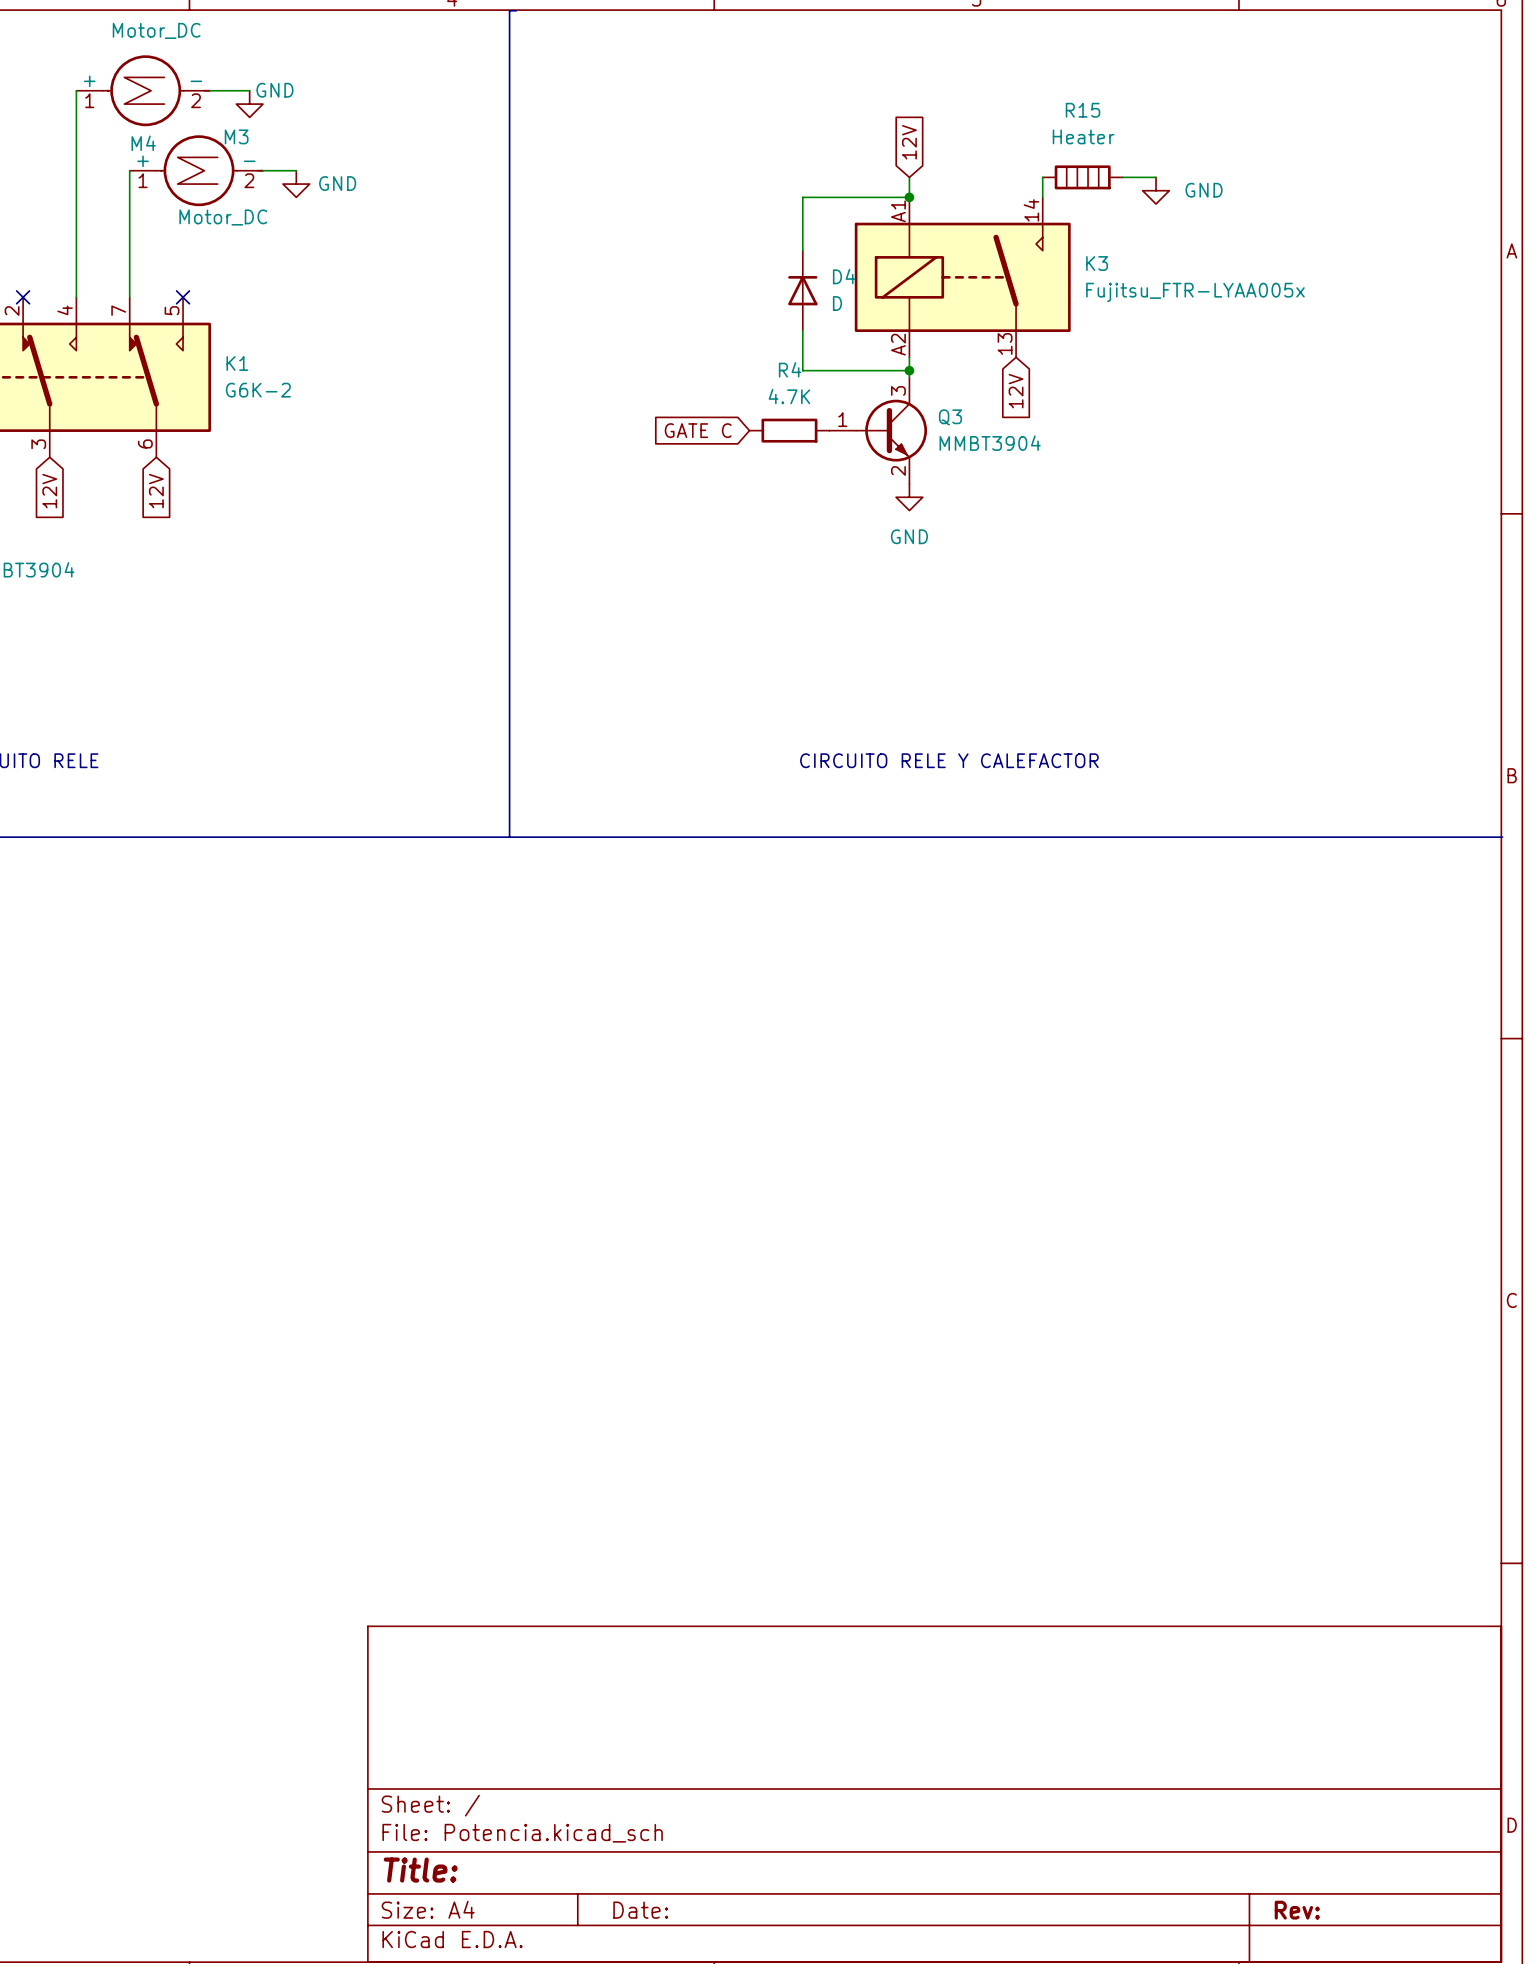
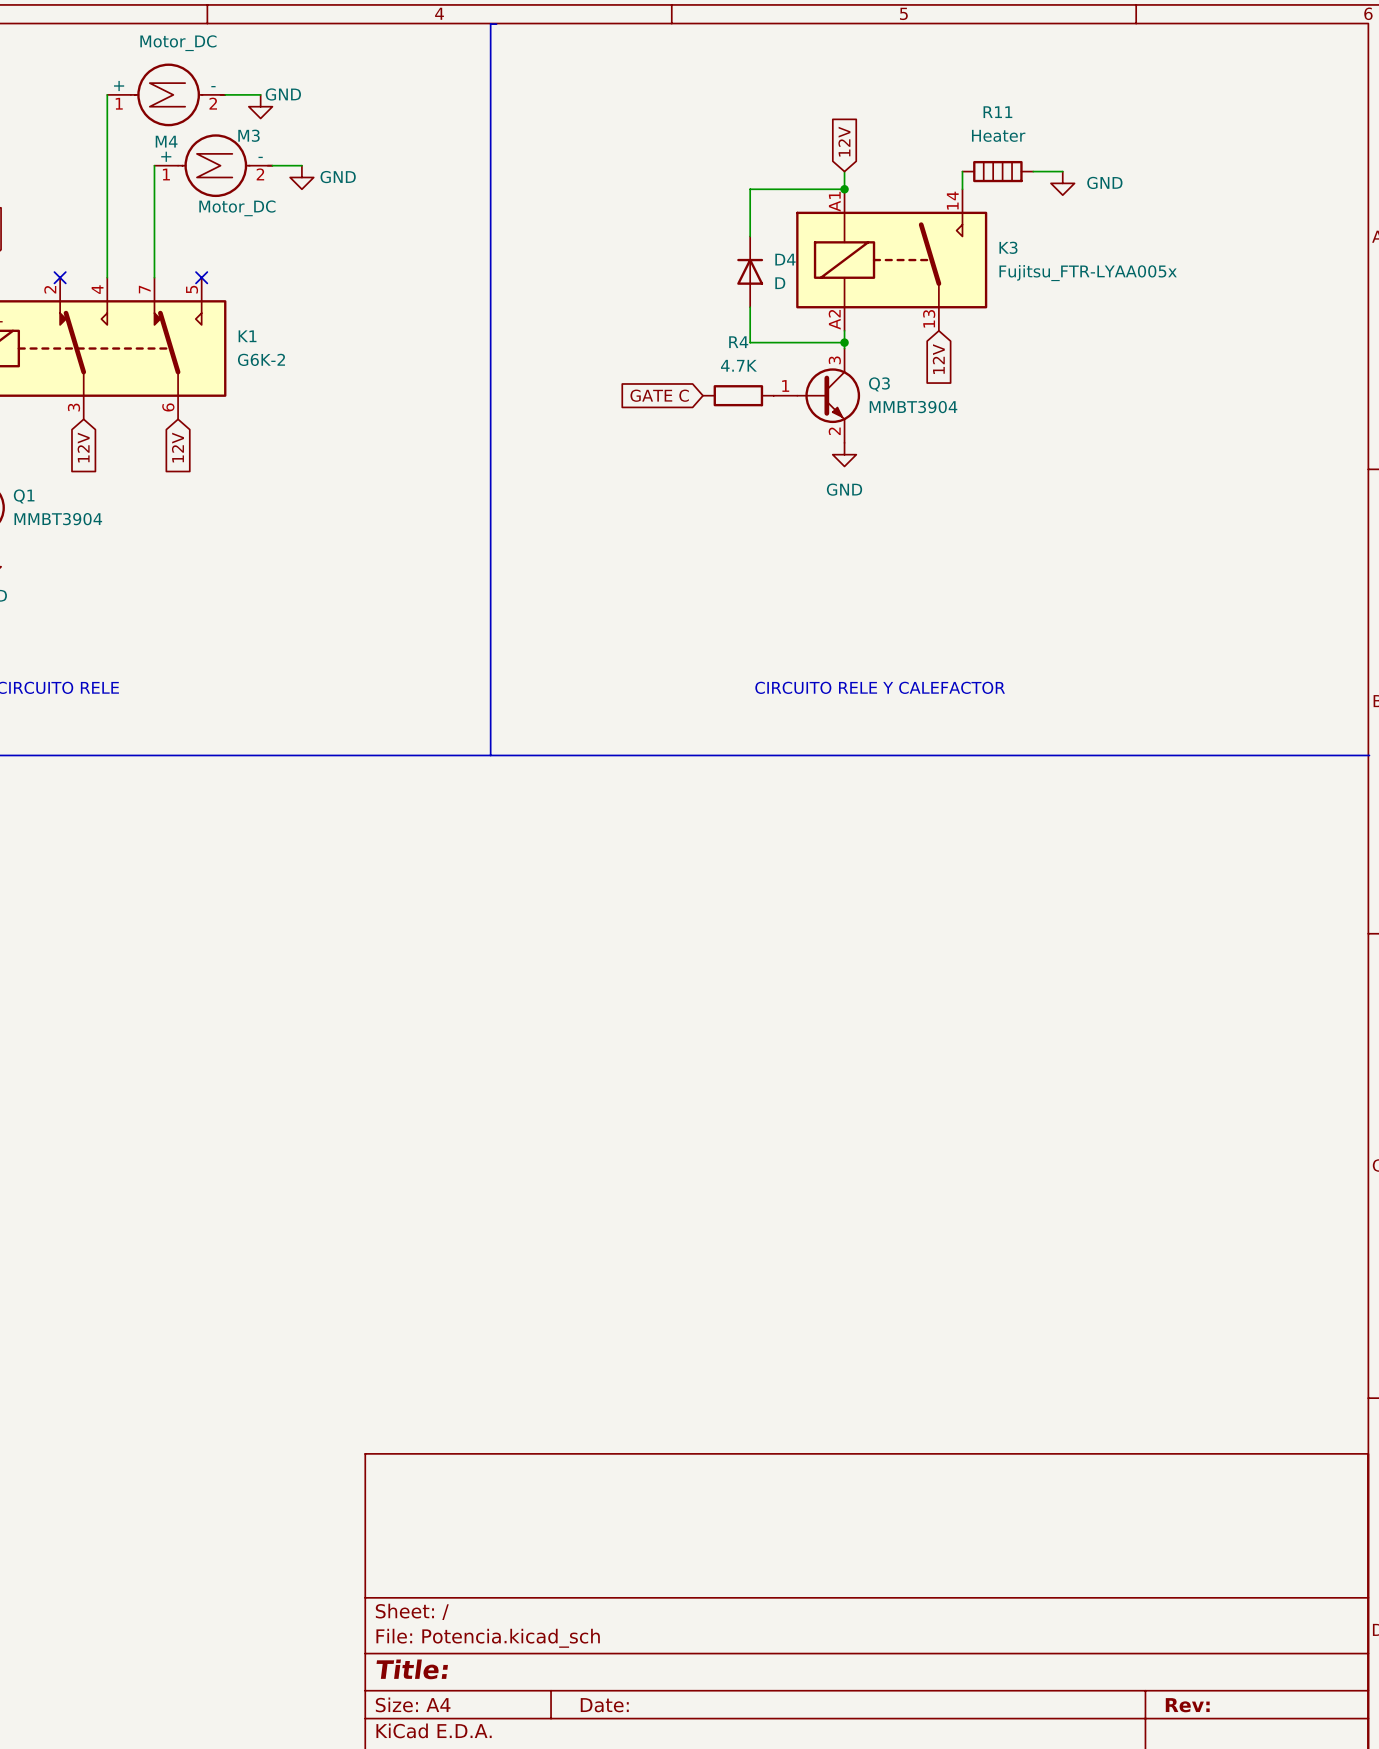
R15 name: R15 (1083, 110) -> R11 (997, 112)

